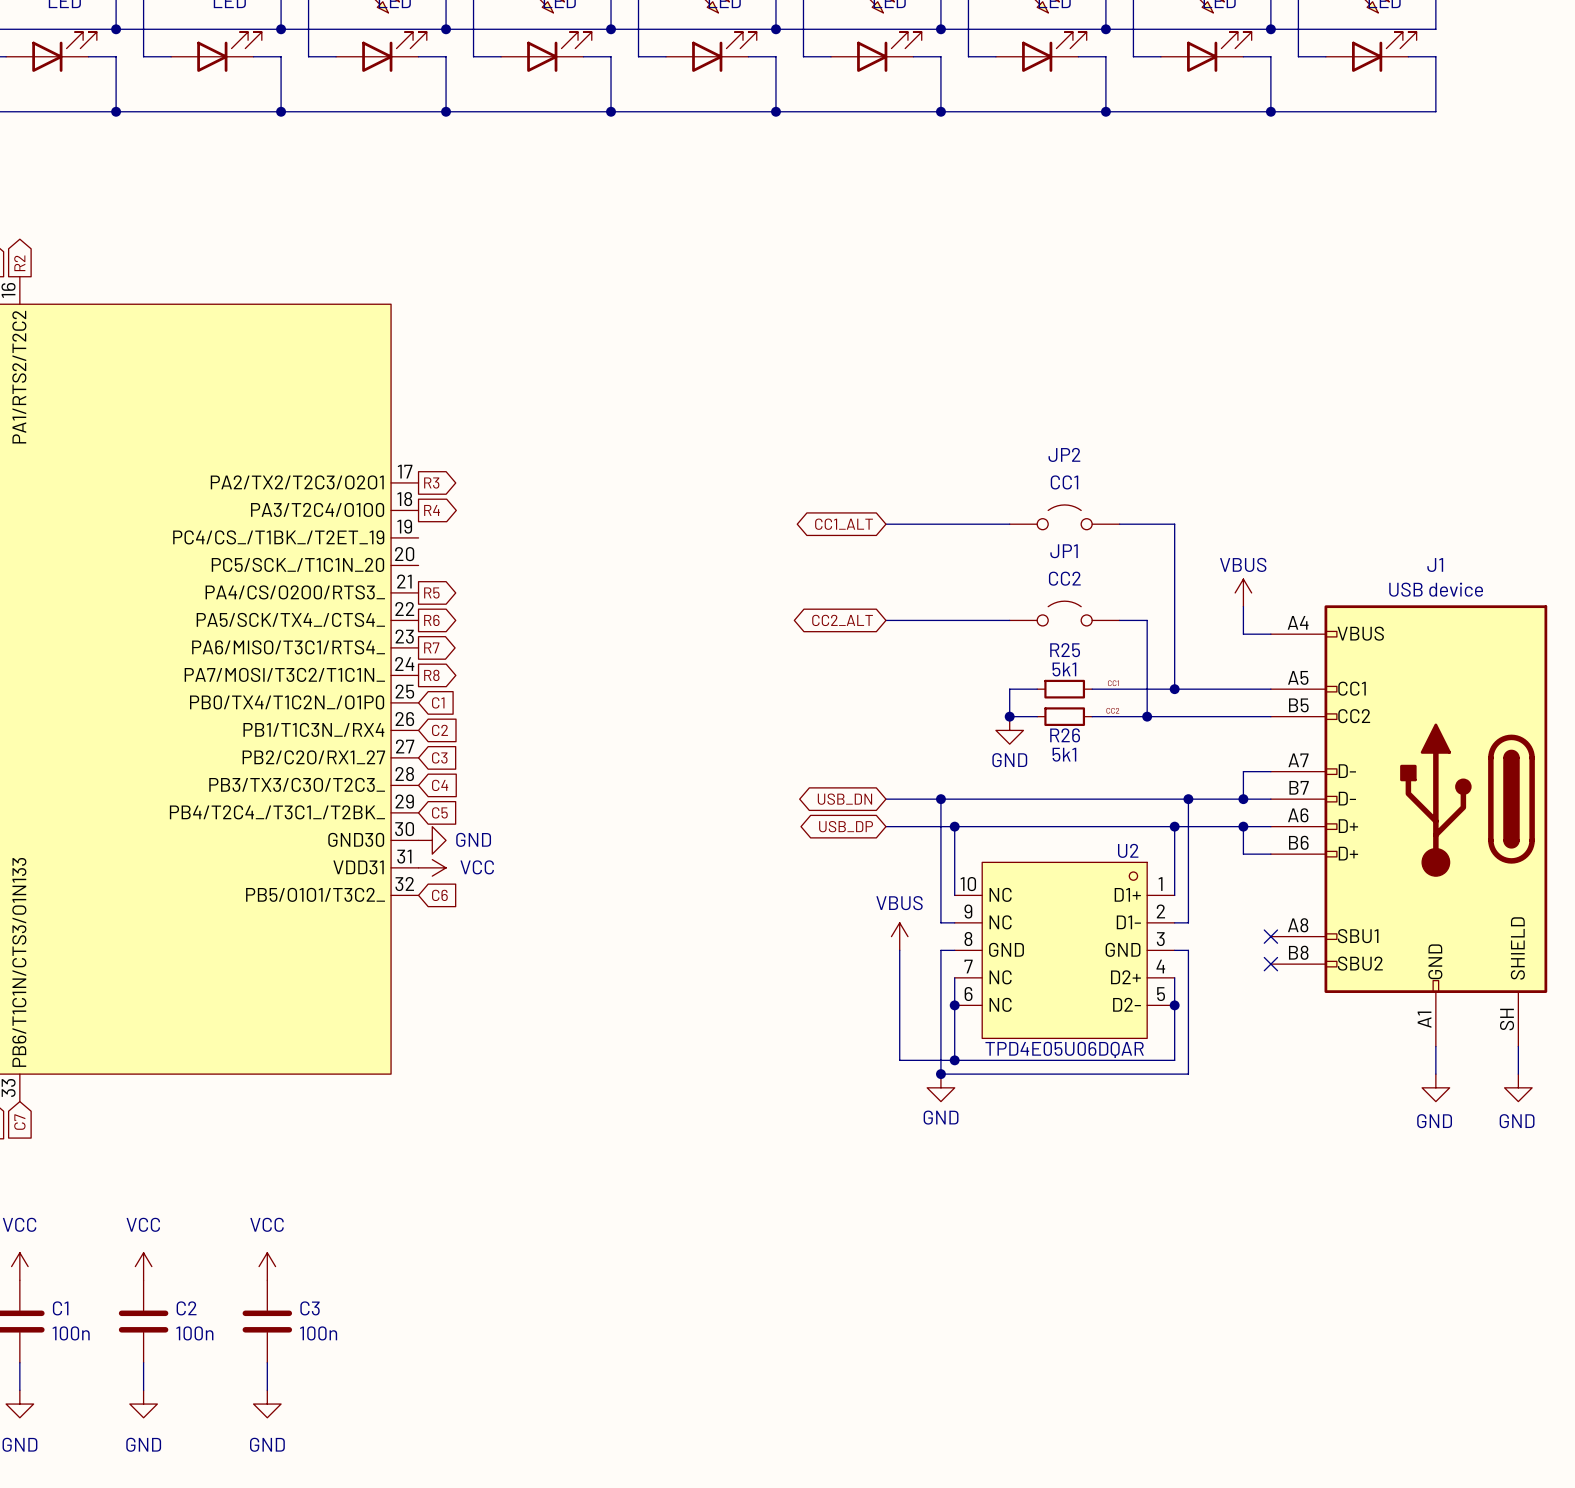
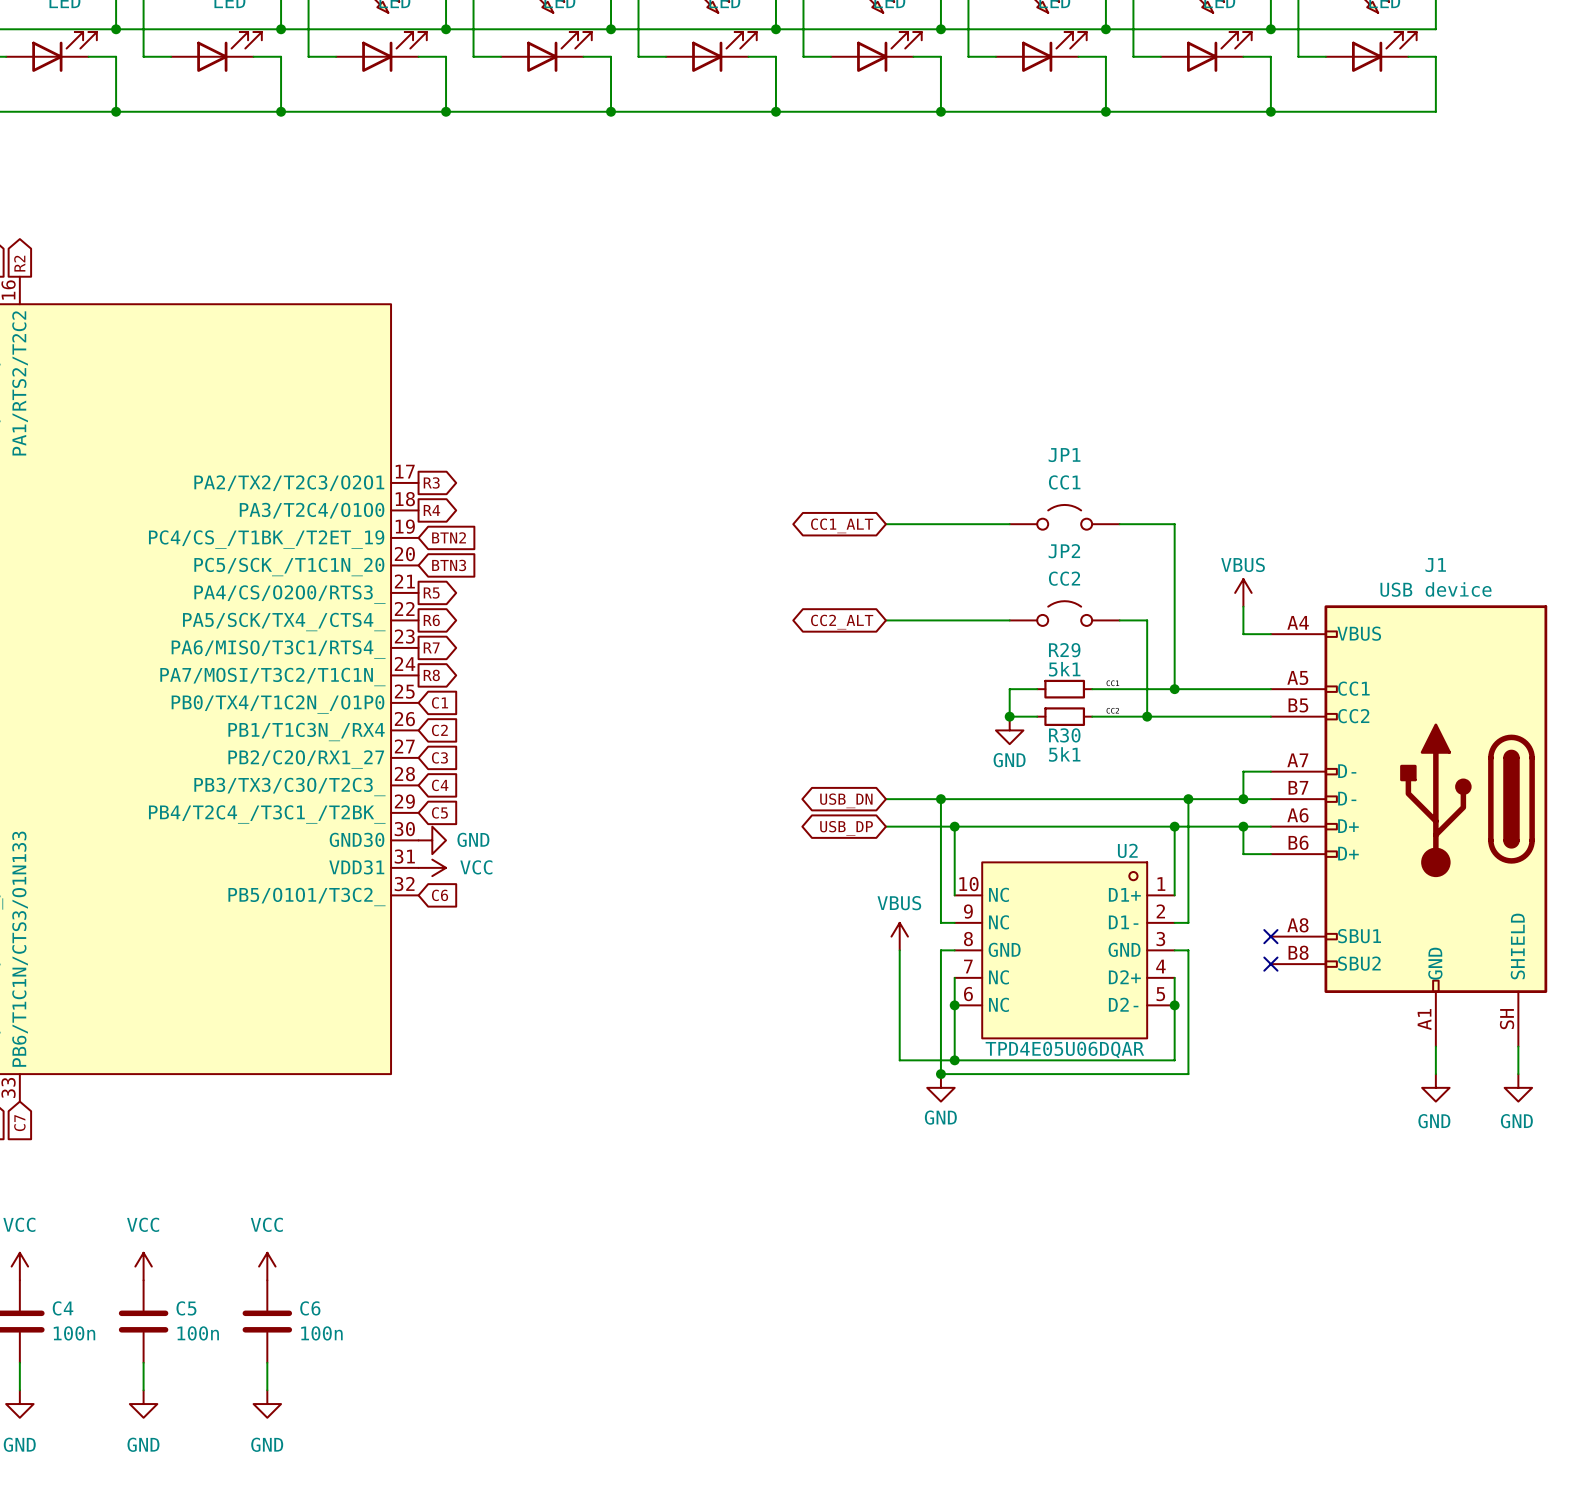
JP2 name: JP2 (1064, 454) -> JP1 (1064, 455)
global label: none -> BTN2 (449, 537)
JP1 name: JP1 (1064, 551) -> JP2 (1064, 551)
global label: none -> BTN3 (449, 565)
R25 name: R25 (1065, 650) -> R29 (1064, 650)
R26 name: R26 (1065, 735) -> R30 (1064, 735)
C1 name: C1 (60, 1308) -> C4 (63, 1308)
C2 name: C2 (186, 1308) -> C5 (186, 1308)
C3 name: C3 (310, 1308) -> C6 (310, 1308)

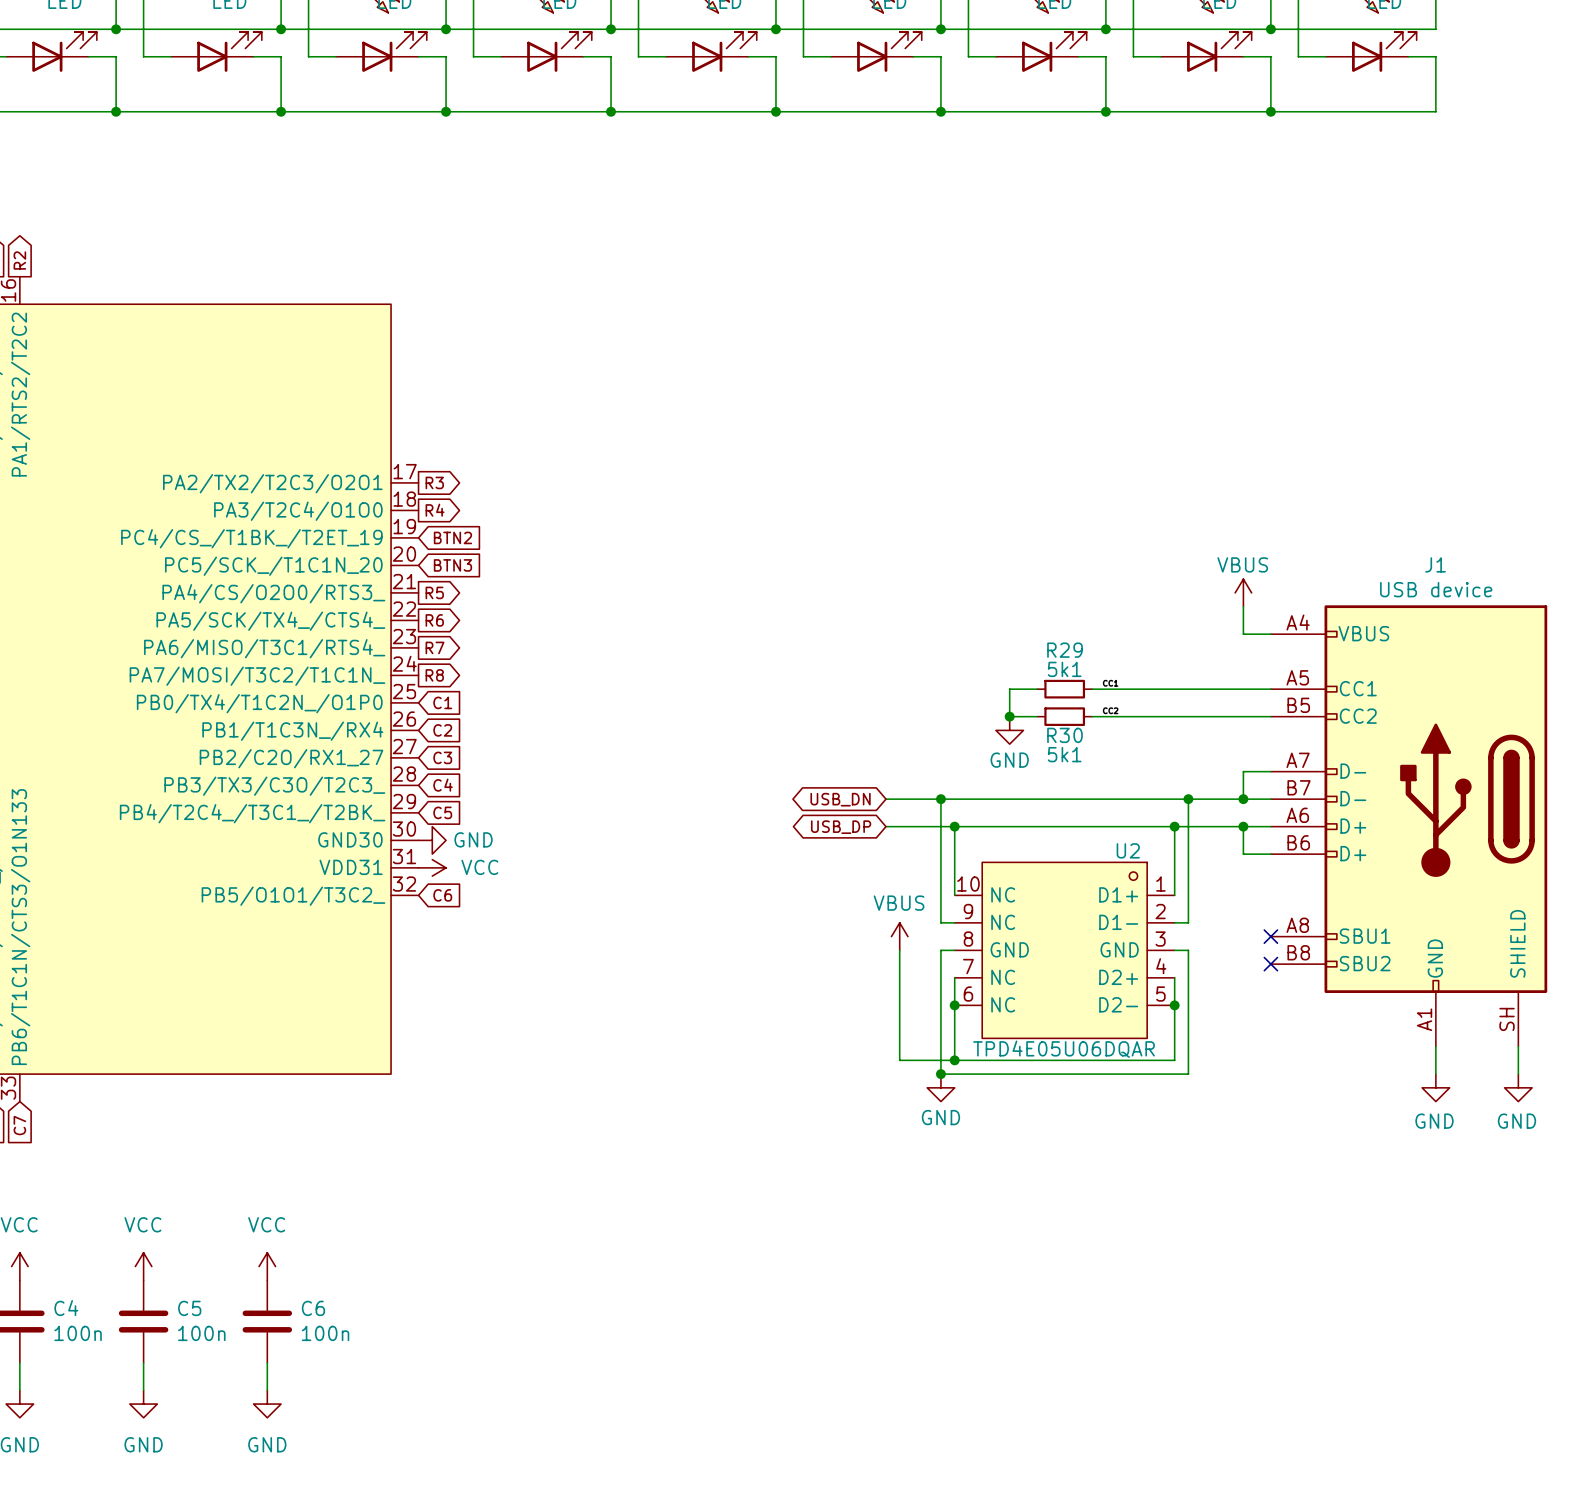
JP1: CC1 (1064, 517) -> none
wire: (885, 524) (1009, 524) -> none
wire: (1119, 524) (1174, 524) (1174, 689) -> none
global label: CC1_ALT (842, 525) -> none
JP2: CC2 (1064, 613) -> none
wire: (885, 620) (1009, 620) -> none
wire: (1119, 620) (1147, 620) (1147, 716) -> none
global label: CC2_ALT (842, 622) -> none
junction: (1174, 689) -> none
junction: (1147, 716) -> none

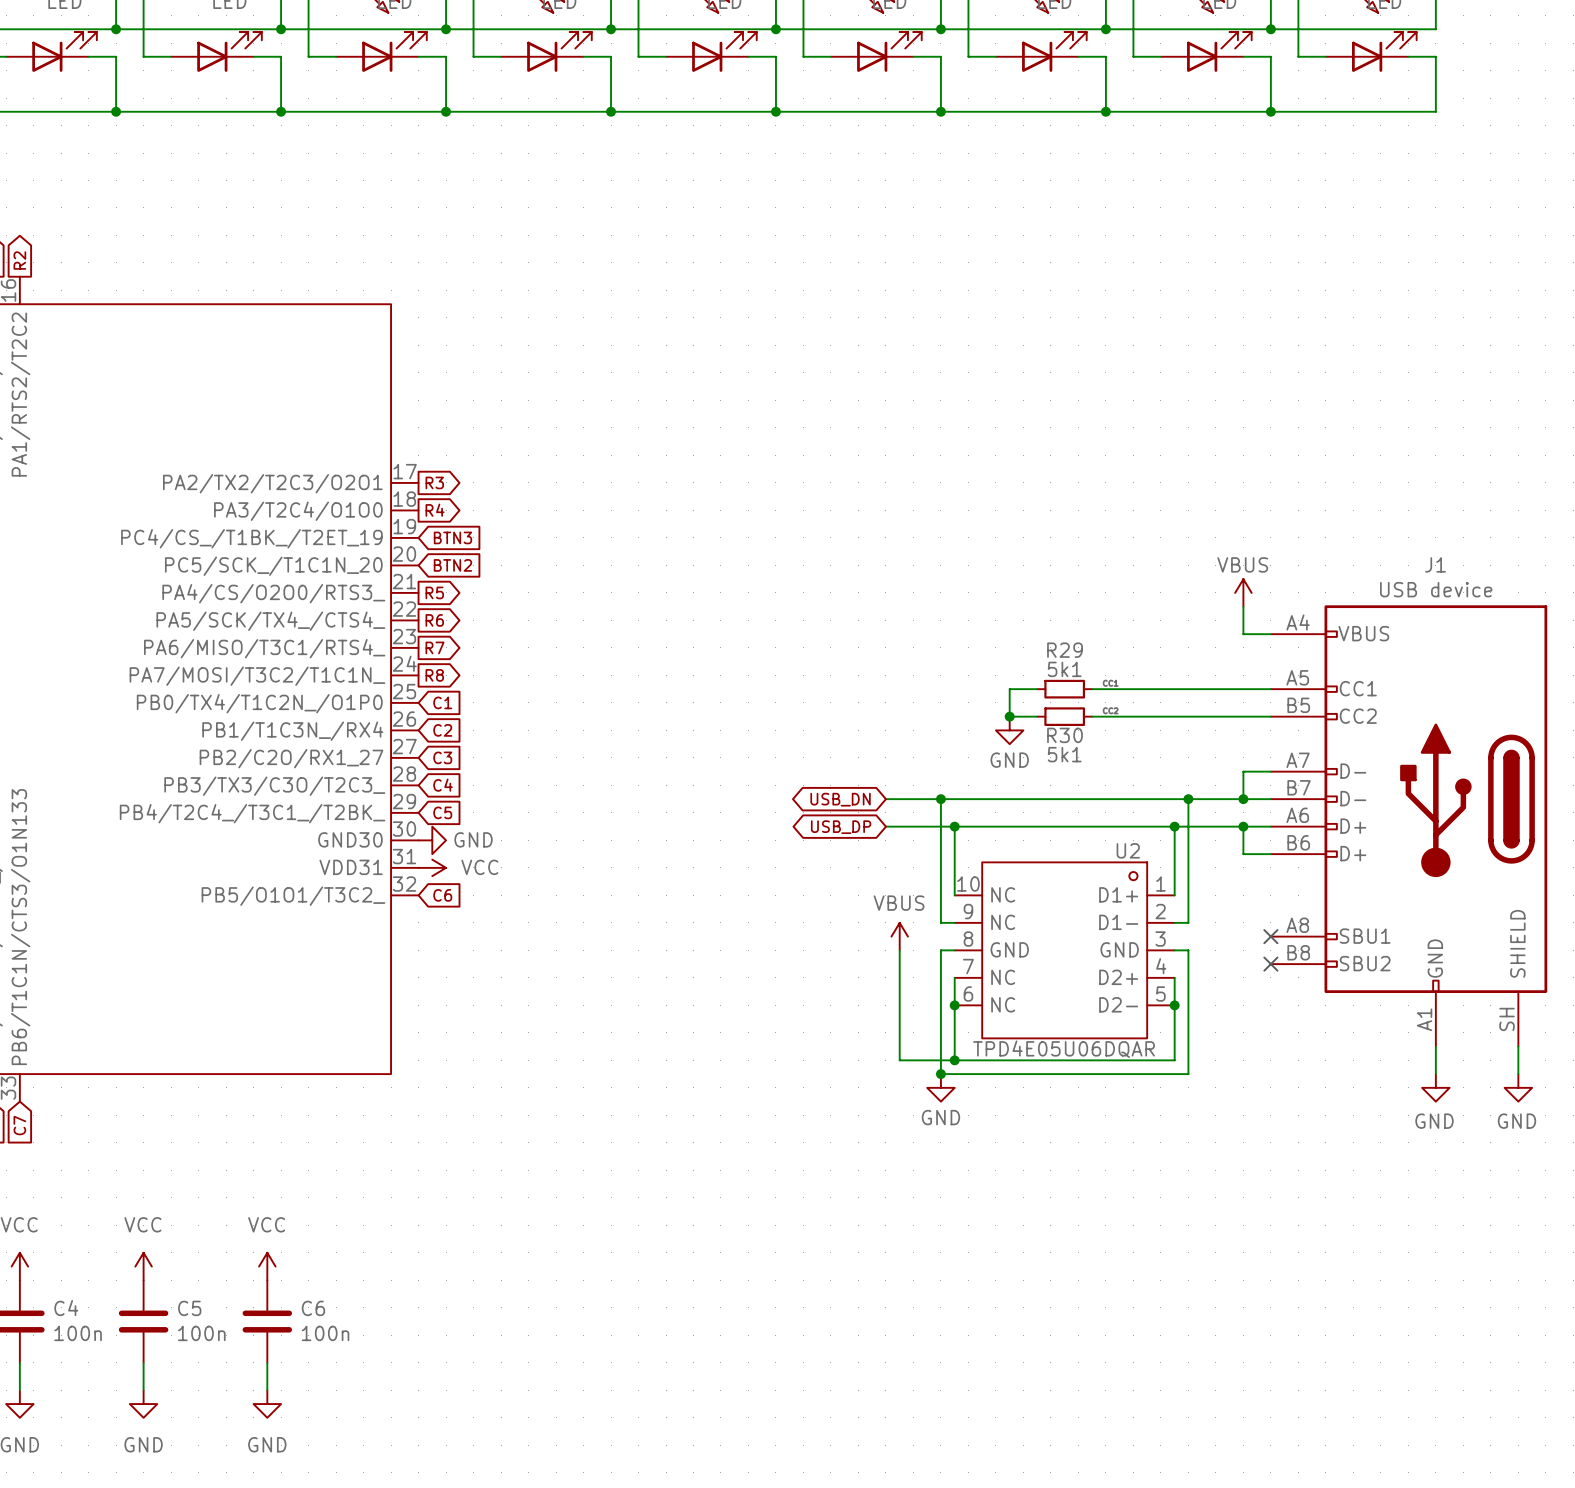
global label: BTN2 (452, 537) -> BTN3 (452, 537)
global label: BTN3 (452, 565) -> BTN2 (452, 565)

